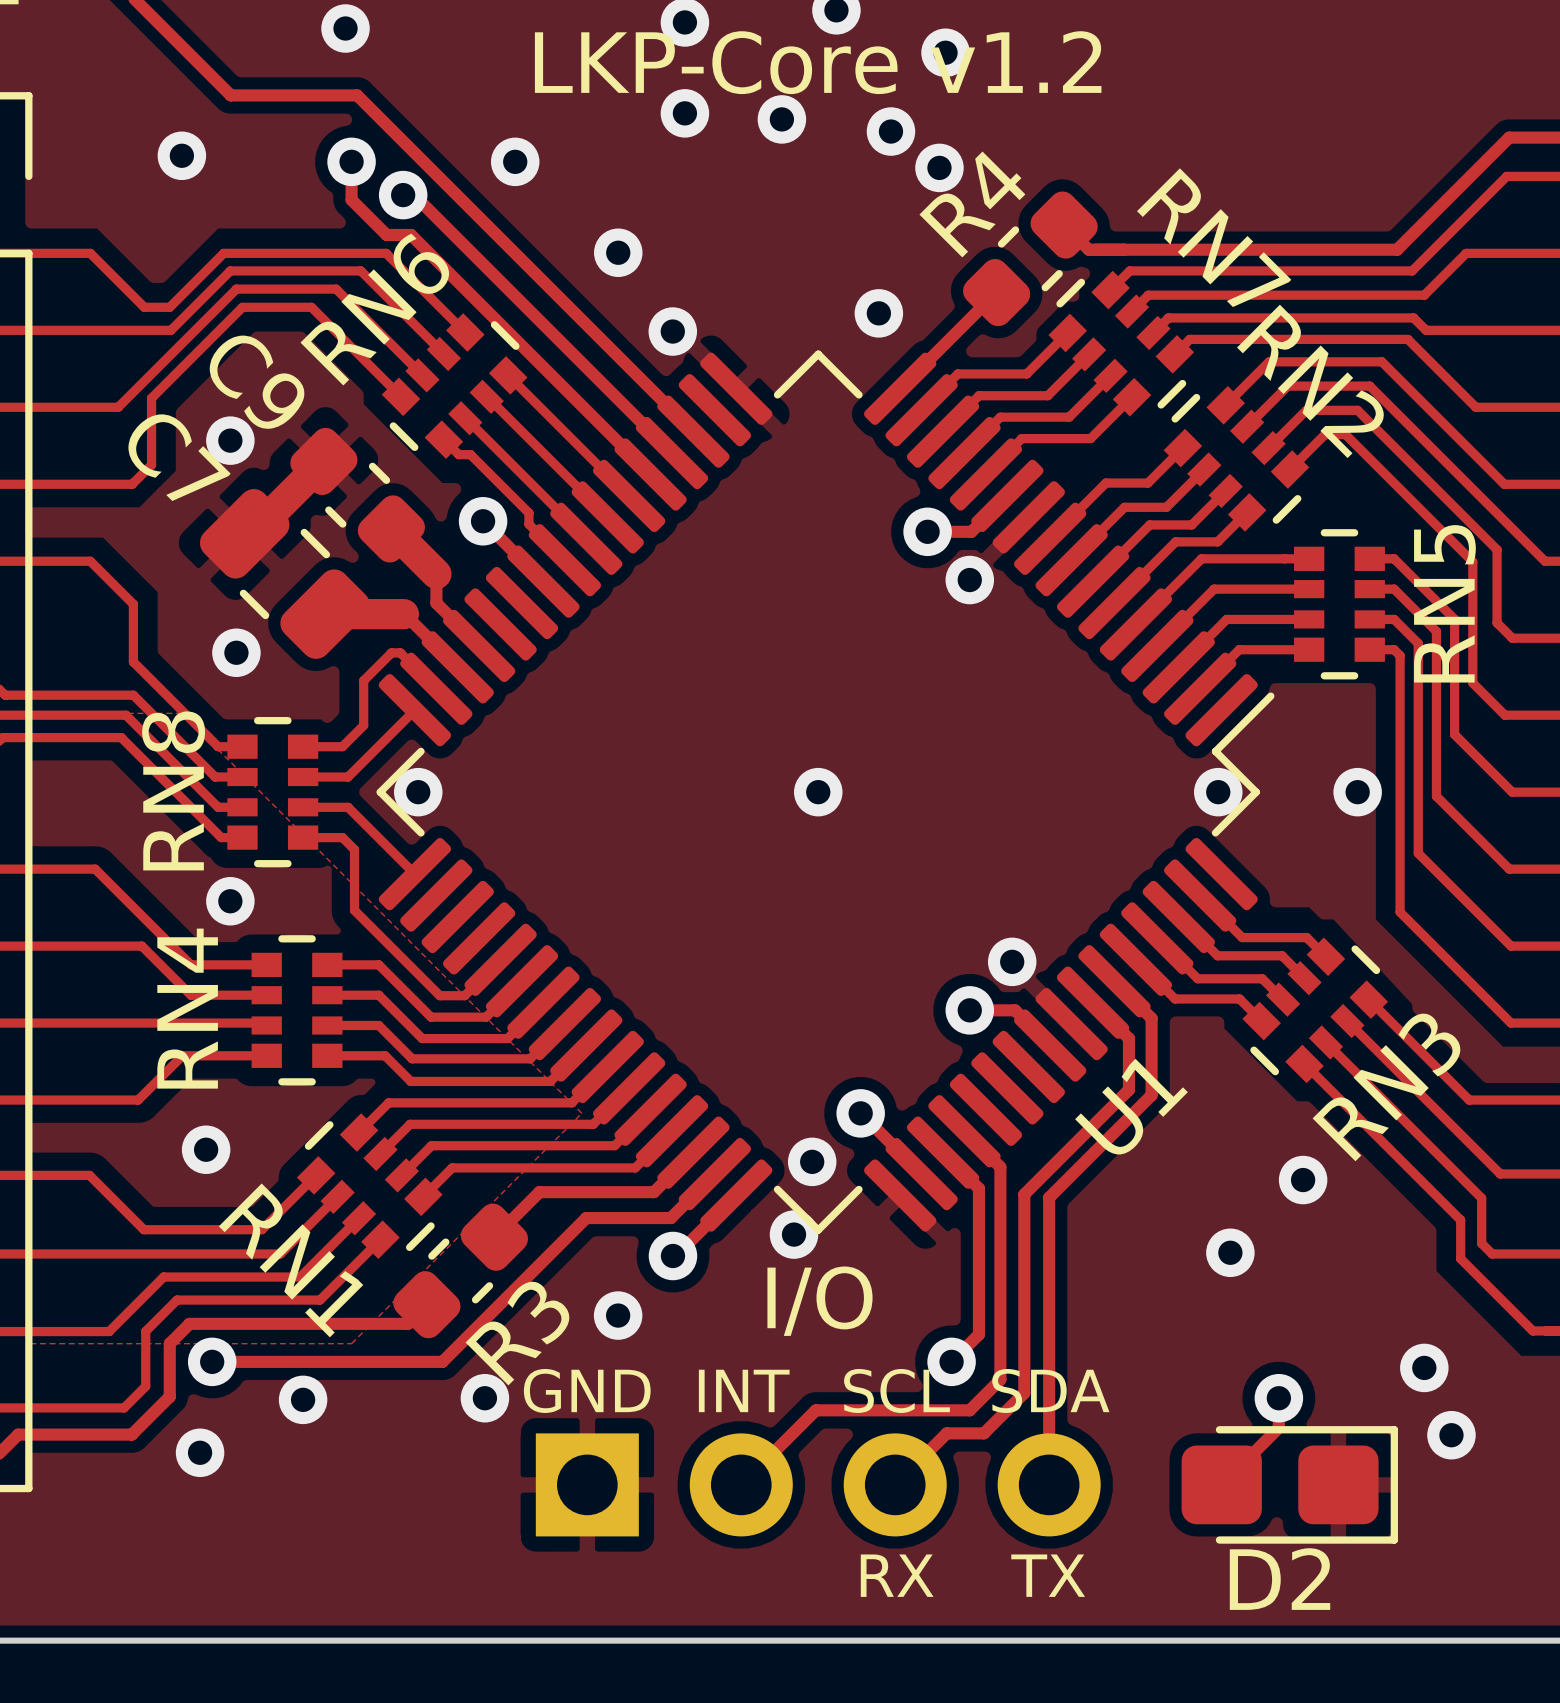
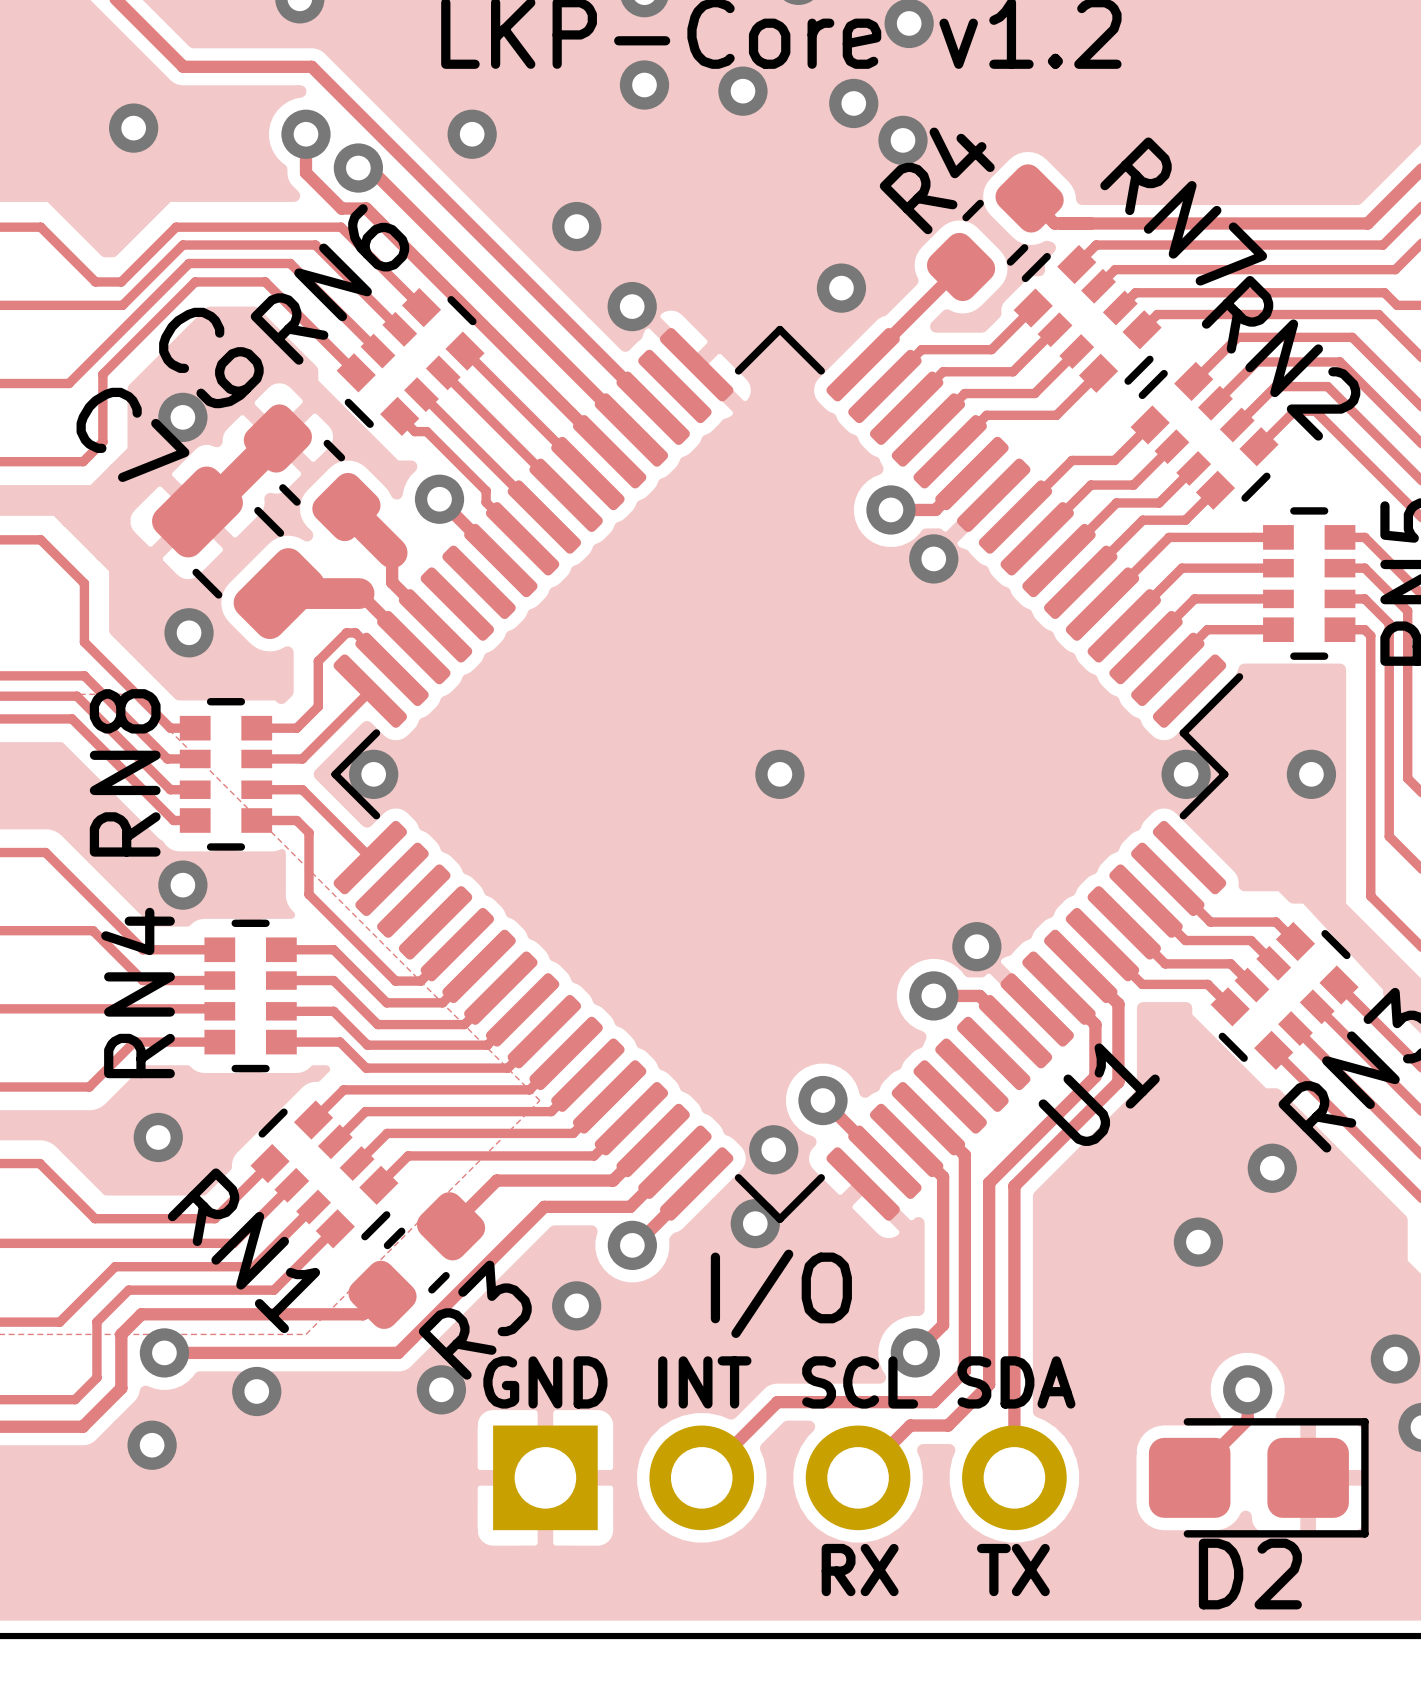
via position: (1357, 792) -> (1311, 774)

